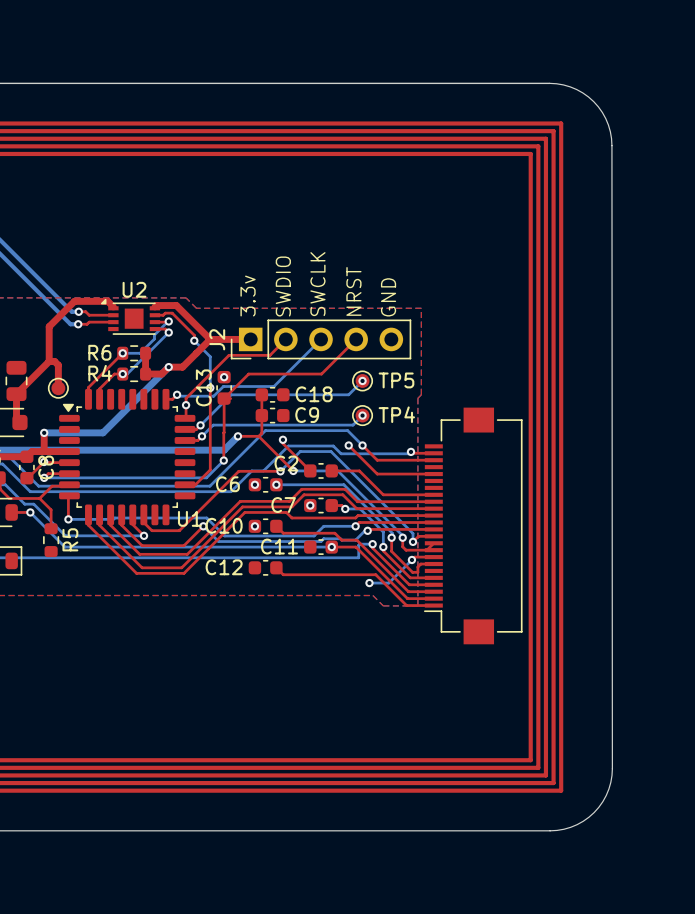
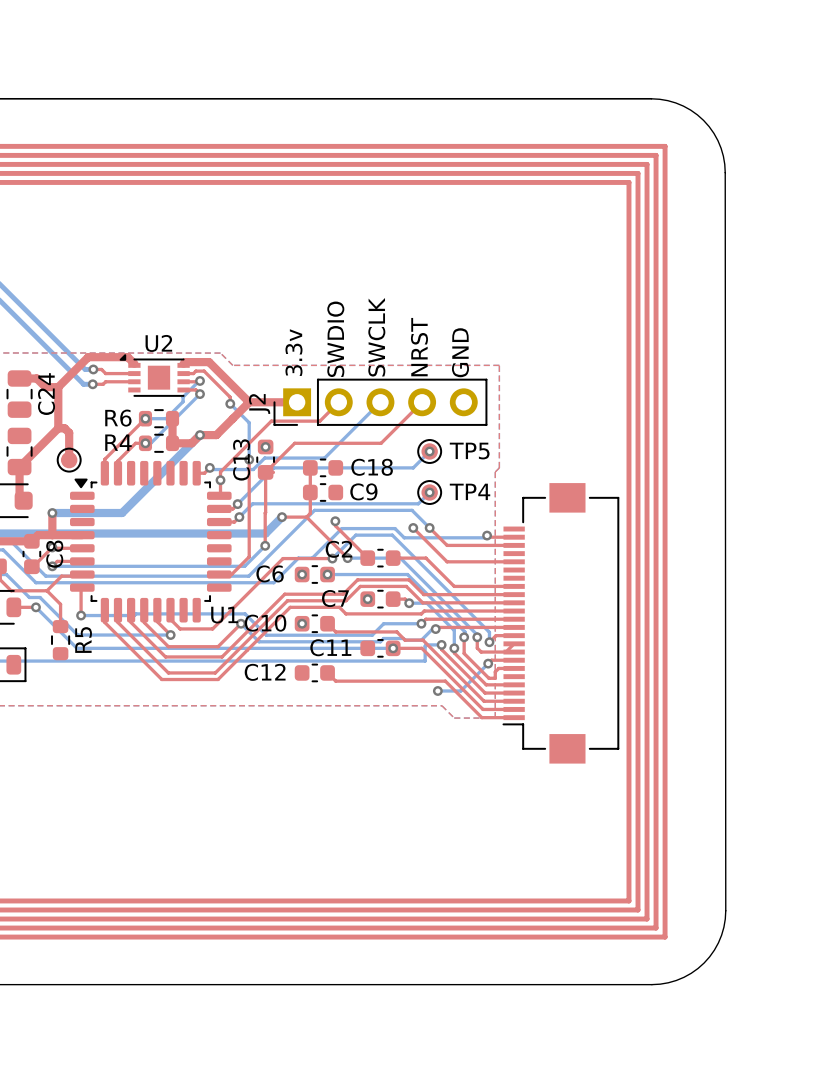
top track: none -> (19, 378) (36, 378) (45, 387) (58, 387)
C24: none -> (19, 394)

